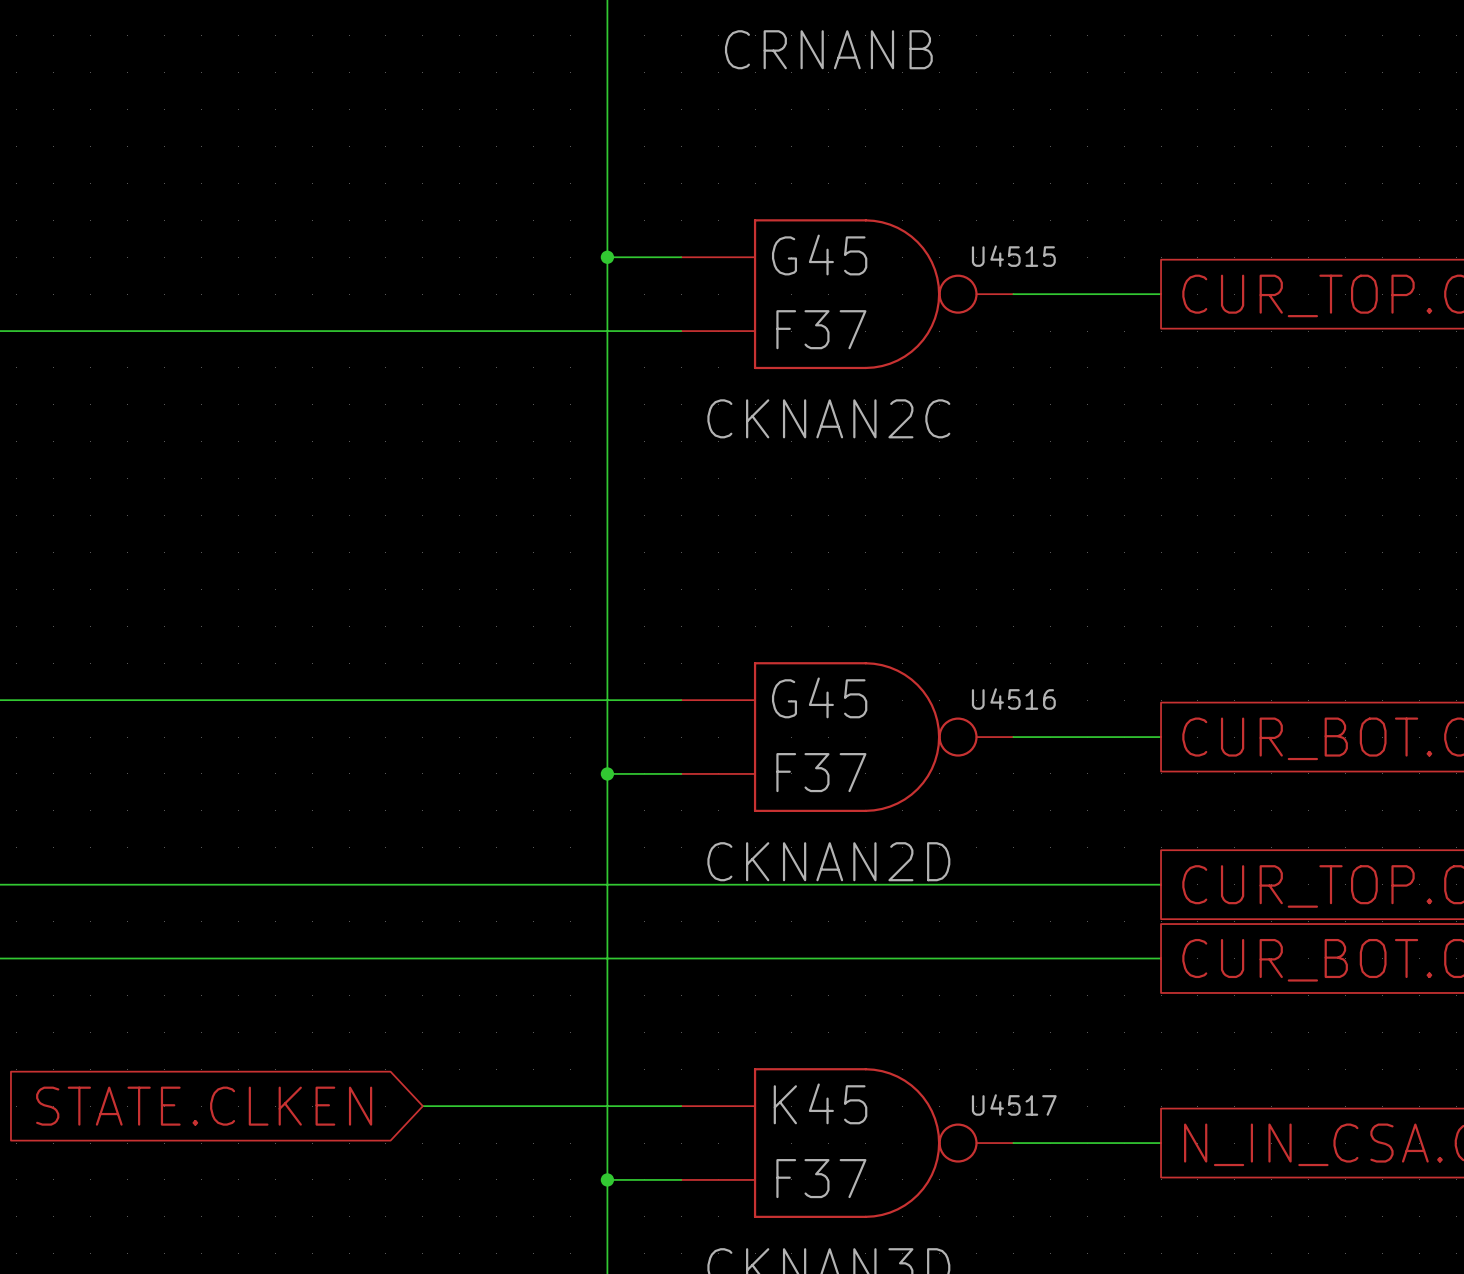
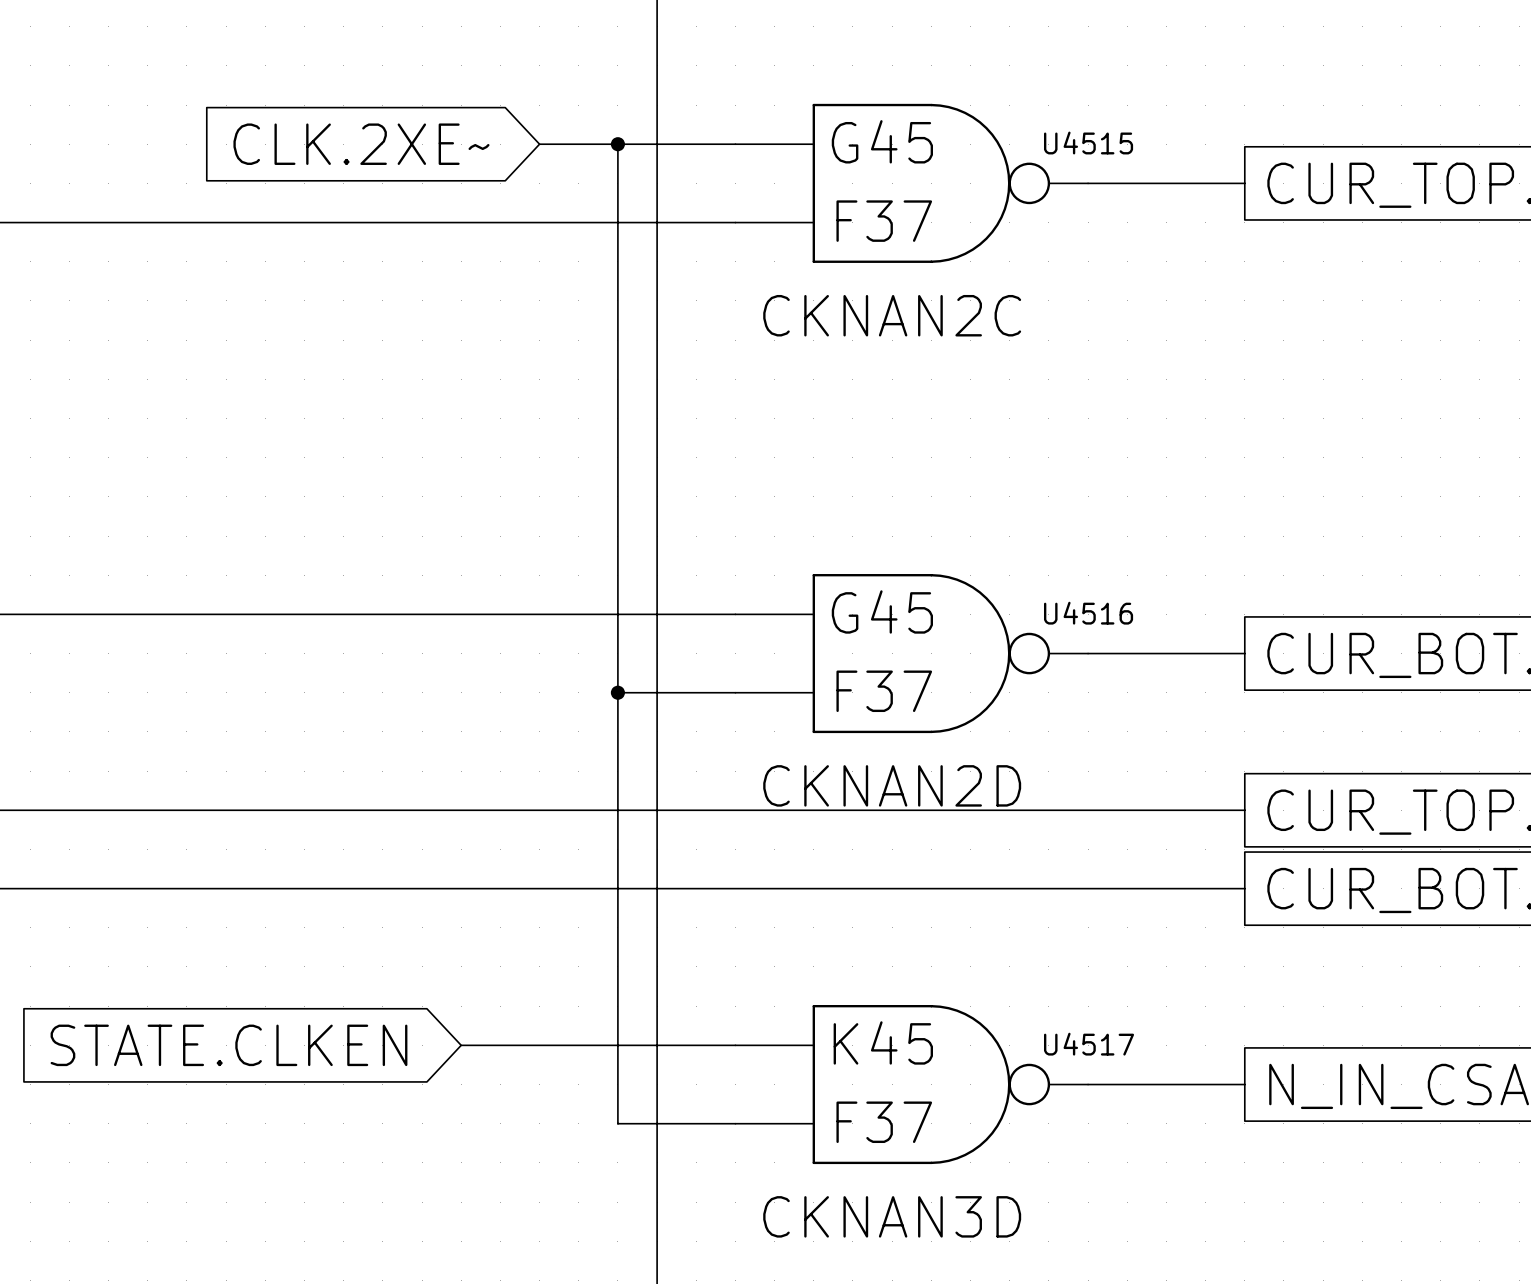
global label: none -> CLK.2XE~ (361, 144)
wire: none -> (539, 144) (657, 144)
wire: none -> (617, 144) (617, 1123) (657, 1123)
junction position: (607, 257) -> (617, 144)
wire: none -> (617, 692) (657, 692)
junction position: (607, 773) -> (617, 692)
junction: (607, 1179) -> none

